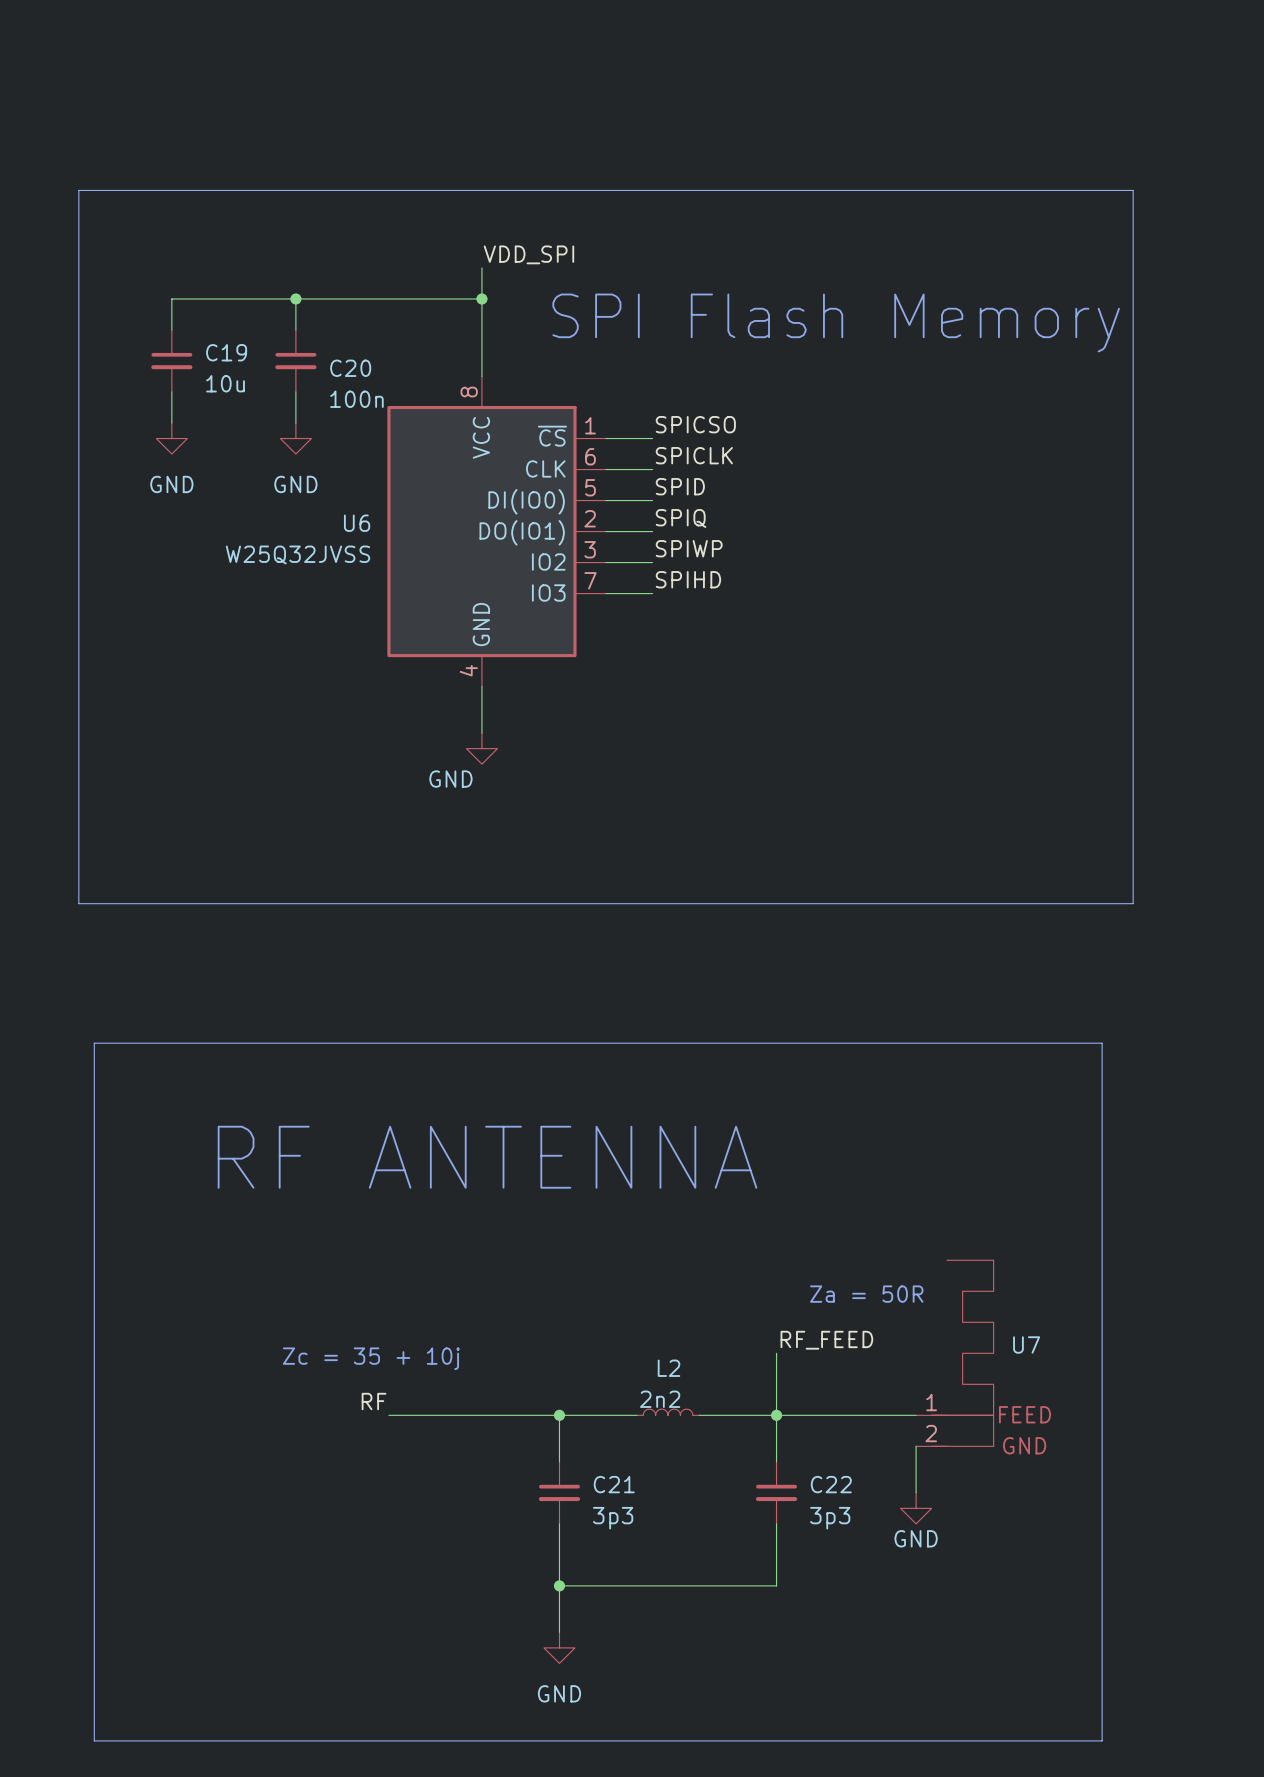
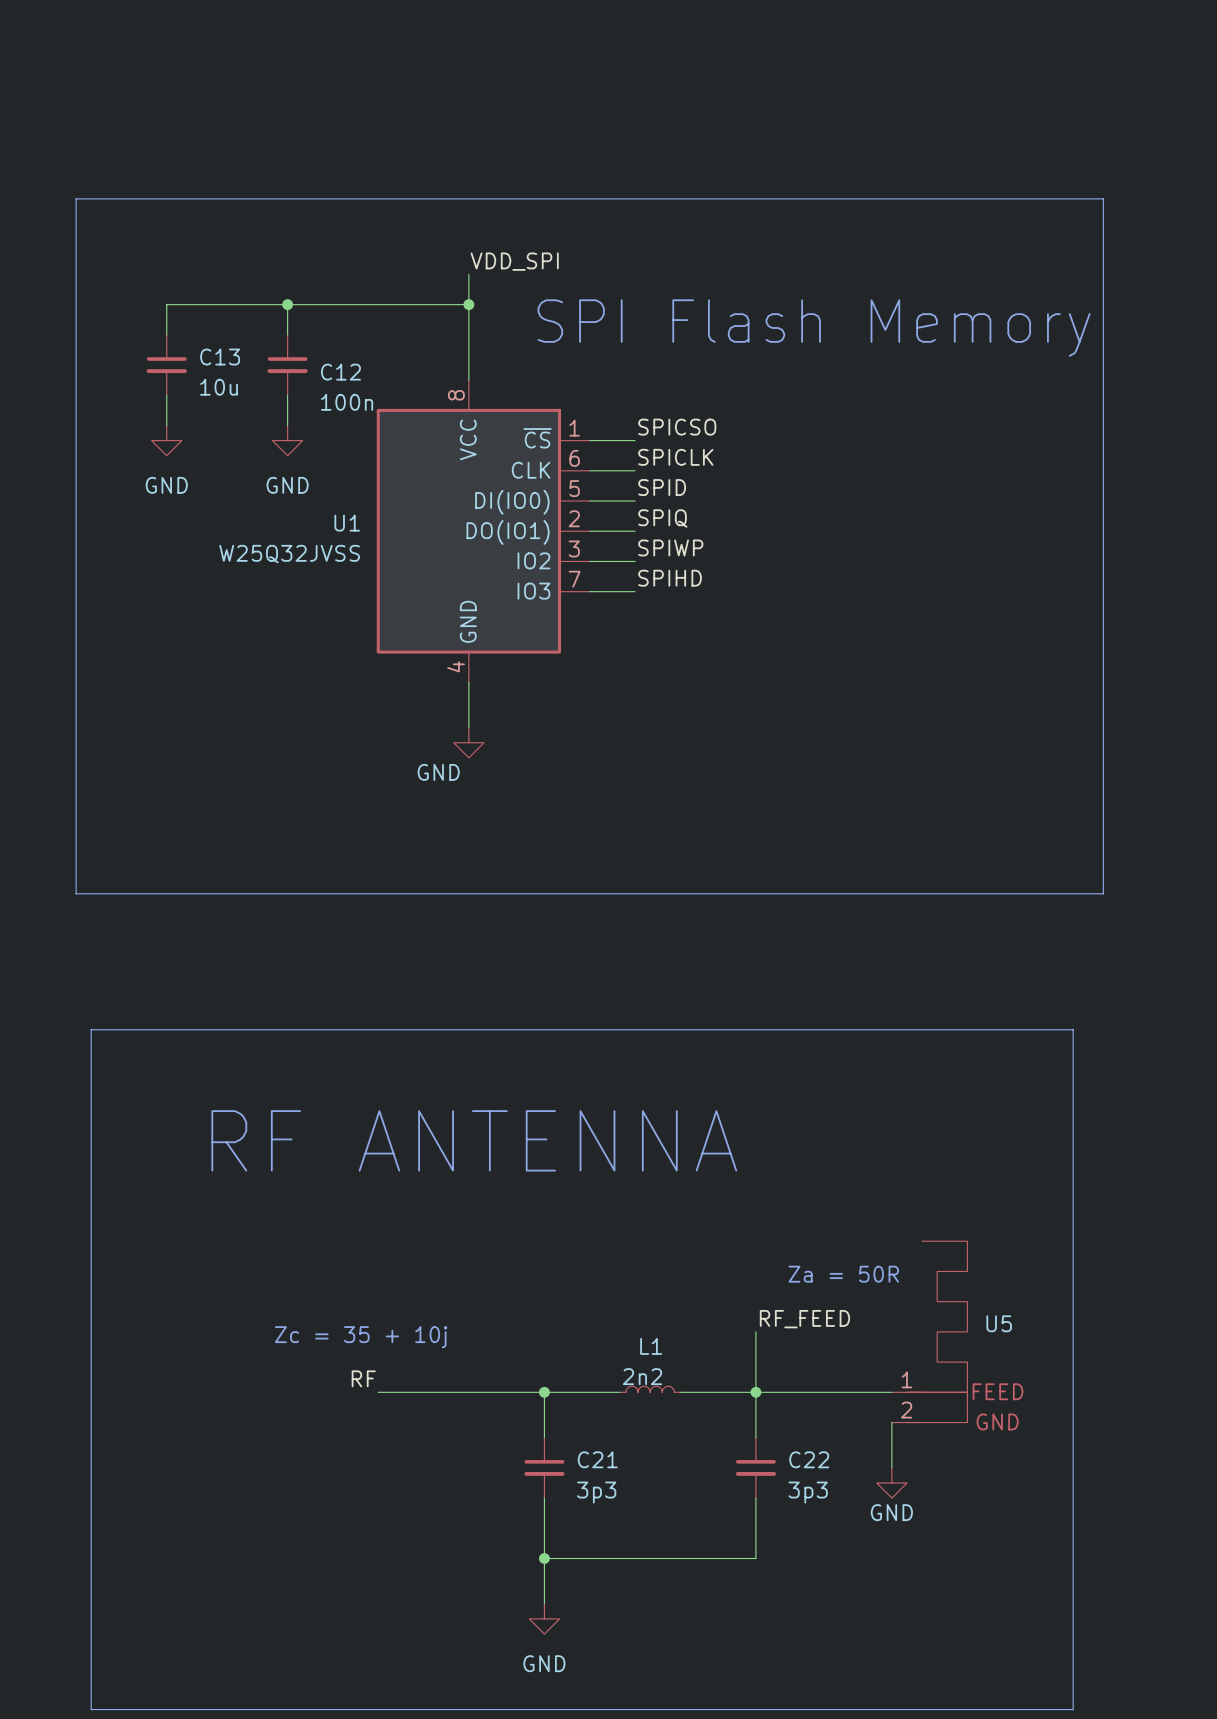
C19 name: C19 (226, 352) -> C13 (220, 357)
C20 name: C20 (350, 368) -> C12 (340, 372)
U6 name: U6 (357, 523) -> U1 (347, 523)
U7 name: U7 (1026, 1344) -> U5 (999, 1323)
L2 name: L2 (669, 1368) -> L1 (651, 1346)

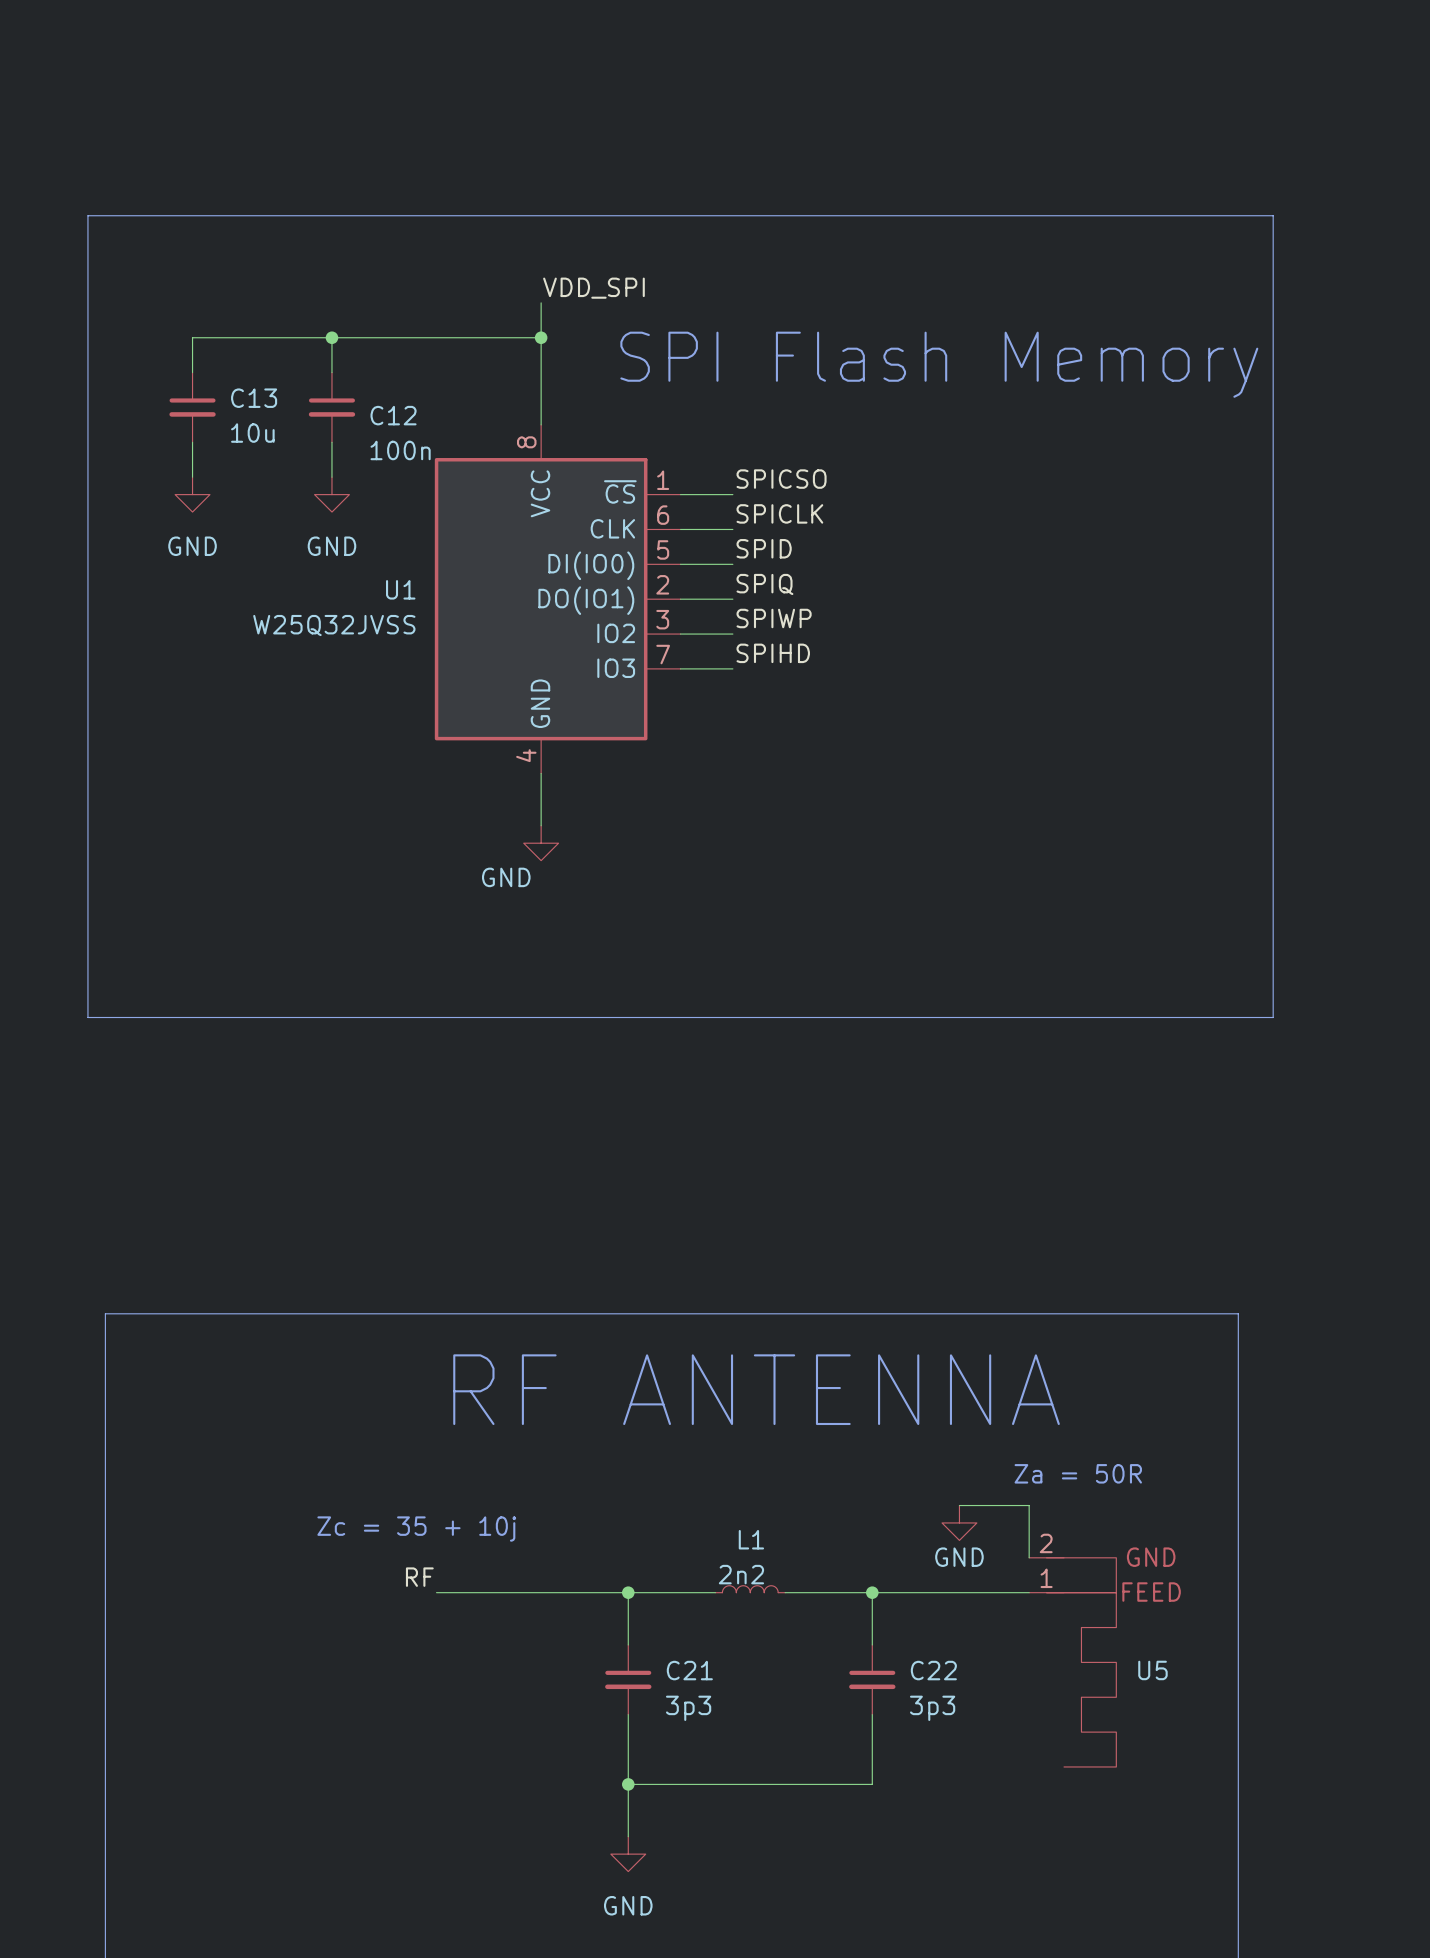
text position: RF ANTENNA (474, 1140) -> RF ANTENNA (756, 1389)
line: (91, 1150) (91, 1029) (1073, 1029) (1073, 1150) -> (105, 1313) (1238, 1313)
text position: Za = 50R (843, 1274) -> Za = 50R (1078, 1473)
wire: none -> (959, 1505) (1029, 1505) (1029, 1557)
label: RF_FEED (804, 1319) -> none
wire: (755, 1331) (755, 1392) -> none
U5 position: (929, 1331) -> (1072, 1662)
U5 flip: as is (937, 1331) -> up-down (1081, 1662)
wire: (891, 1422) (891, 1467) -> none
power symbol position: GND (891, 1482) -> GND (959, 1522)

